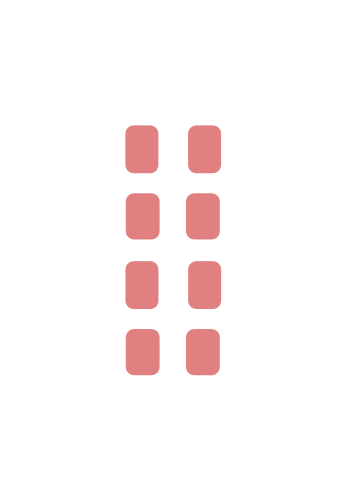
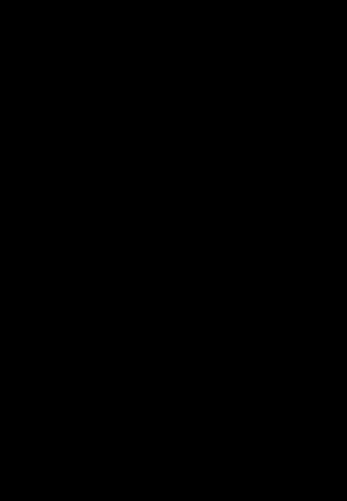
part: (173, 149) -> none
part: (172, 216) -> none
part: (173, 285) -> none
part: (172, 352) -> none

